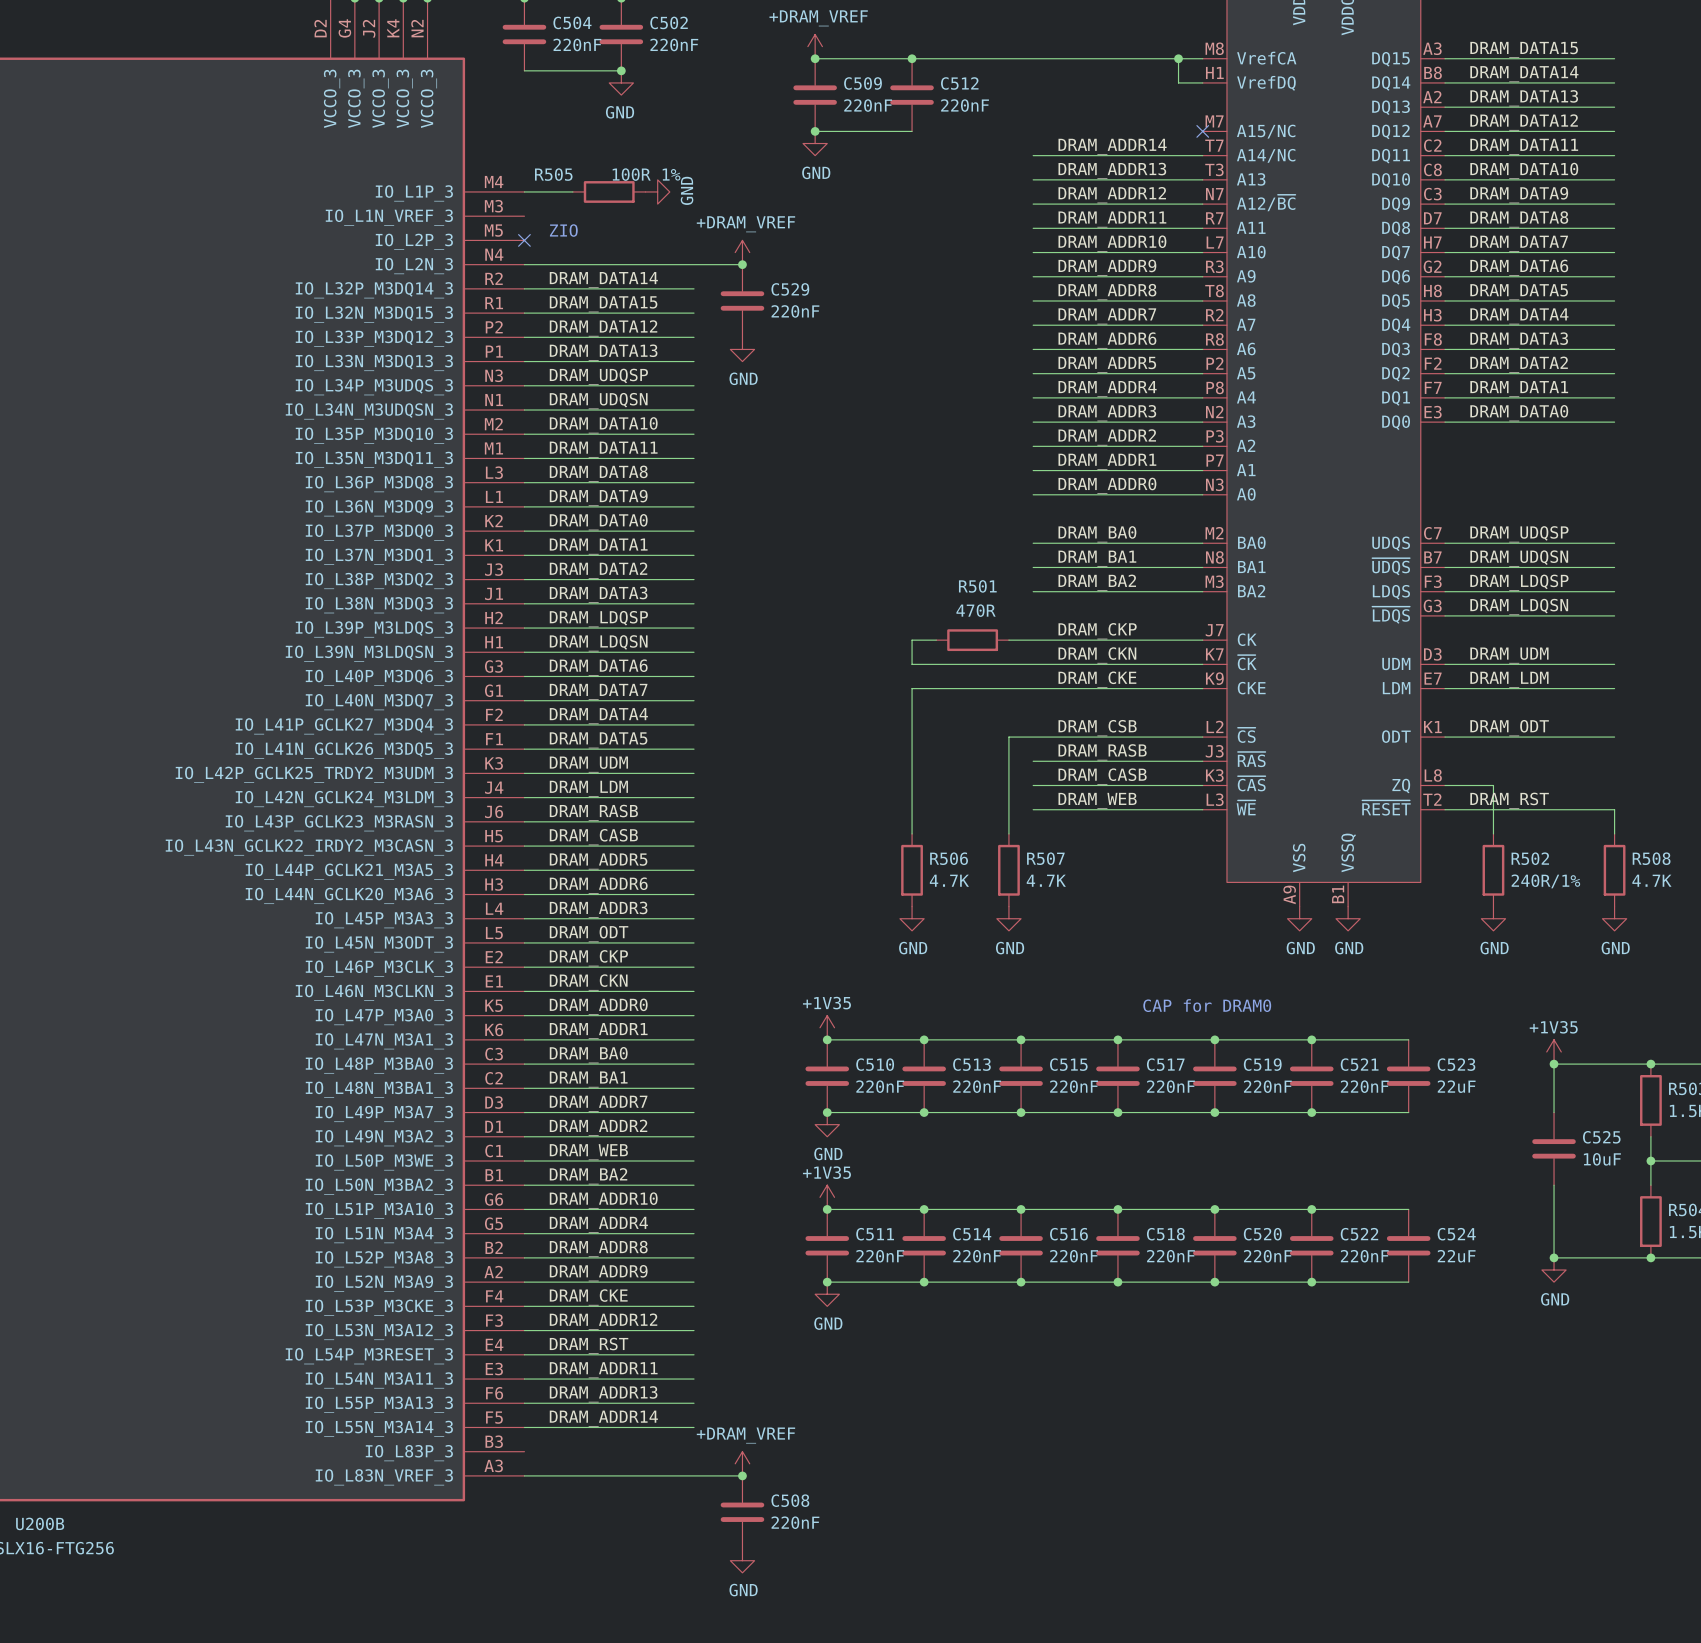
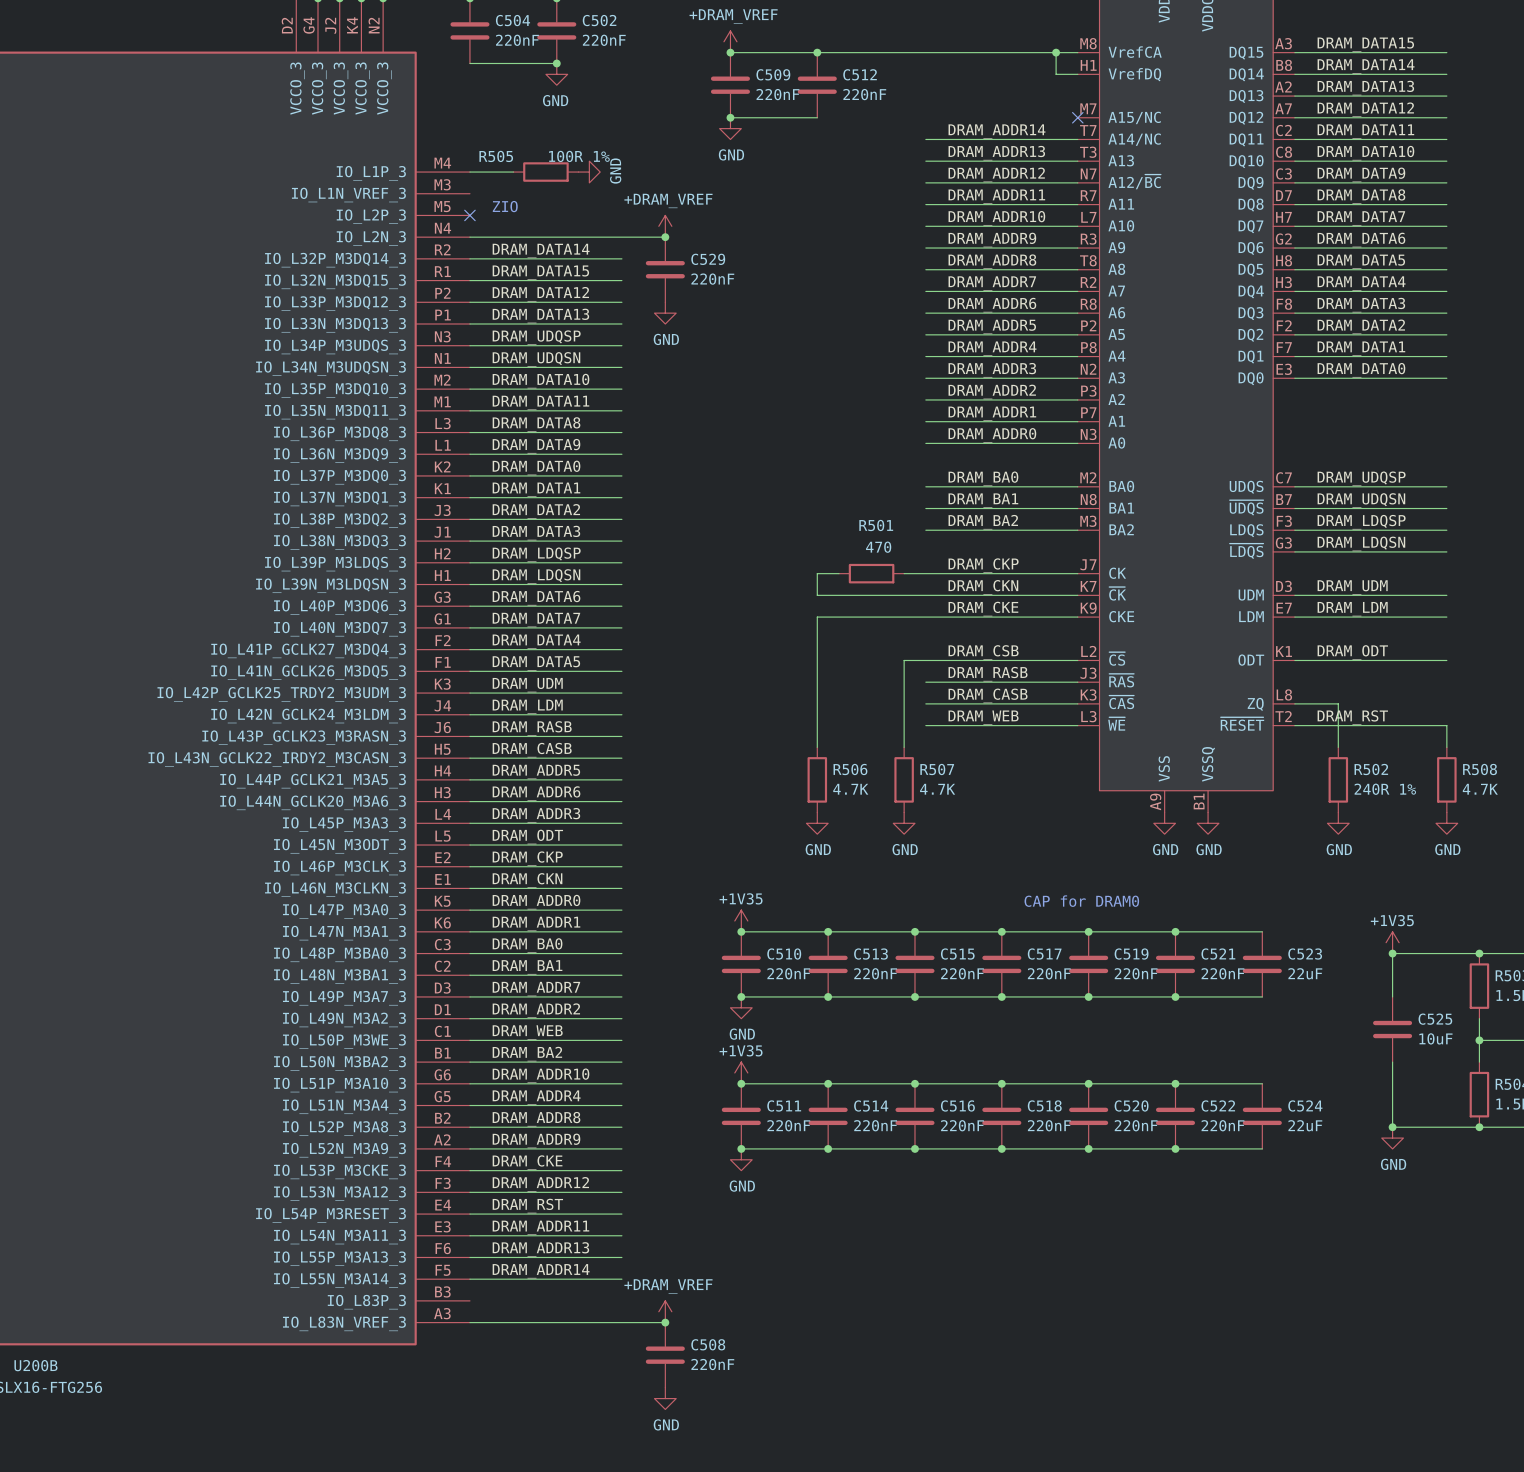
R501 value: 470R (976, 610) -> 470 (878, 547)
R502 value: 240R/1% (1545, 881) -> 240R 1% (1385, 789)

